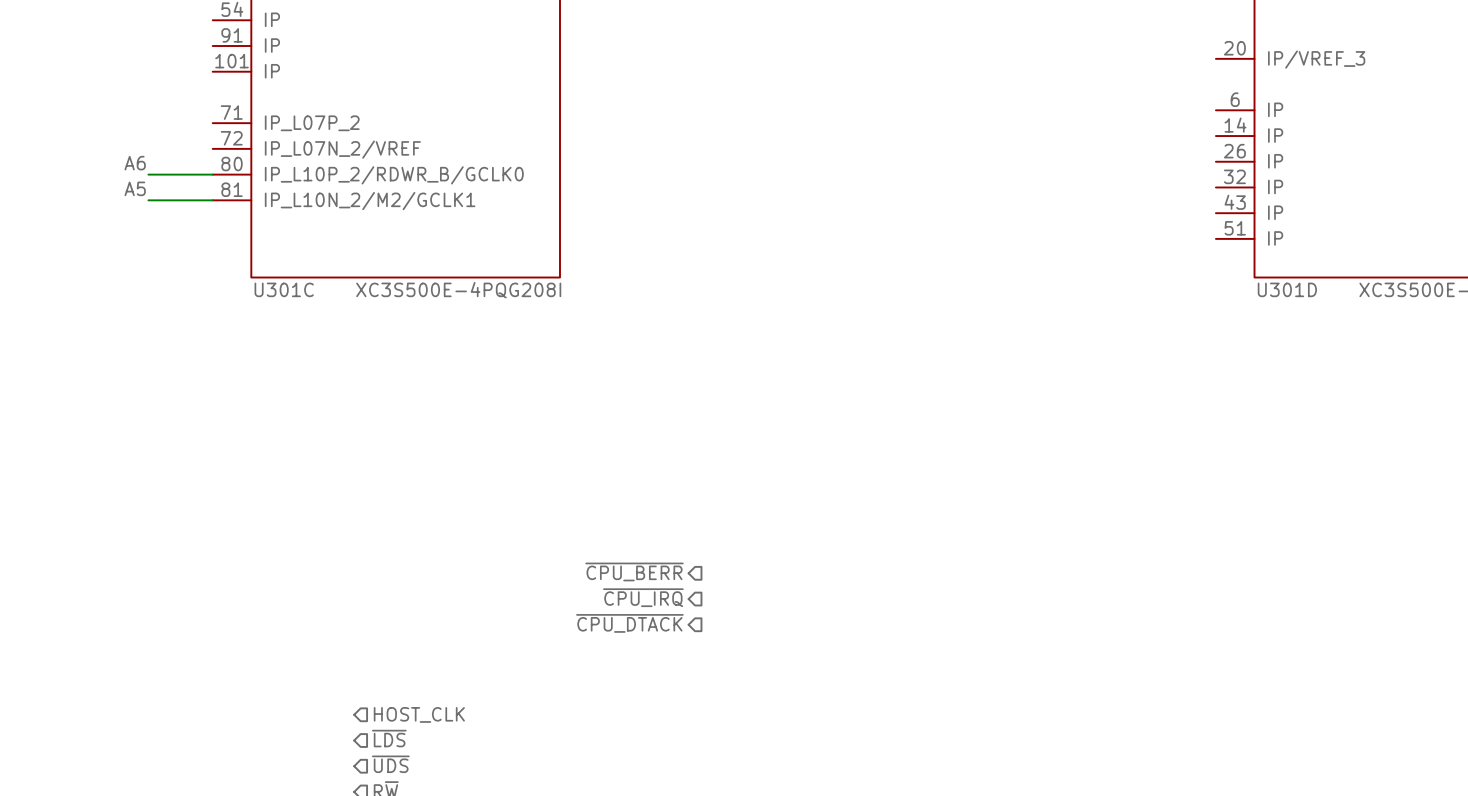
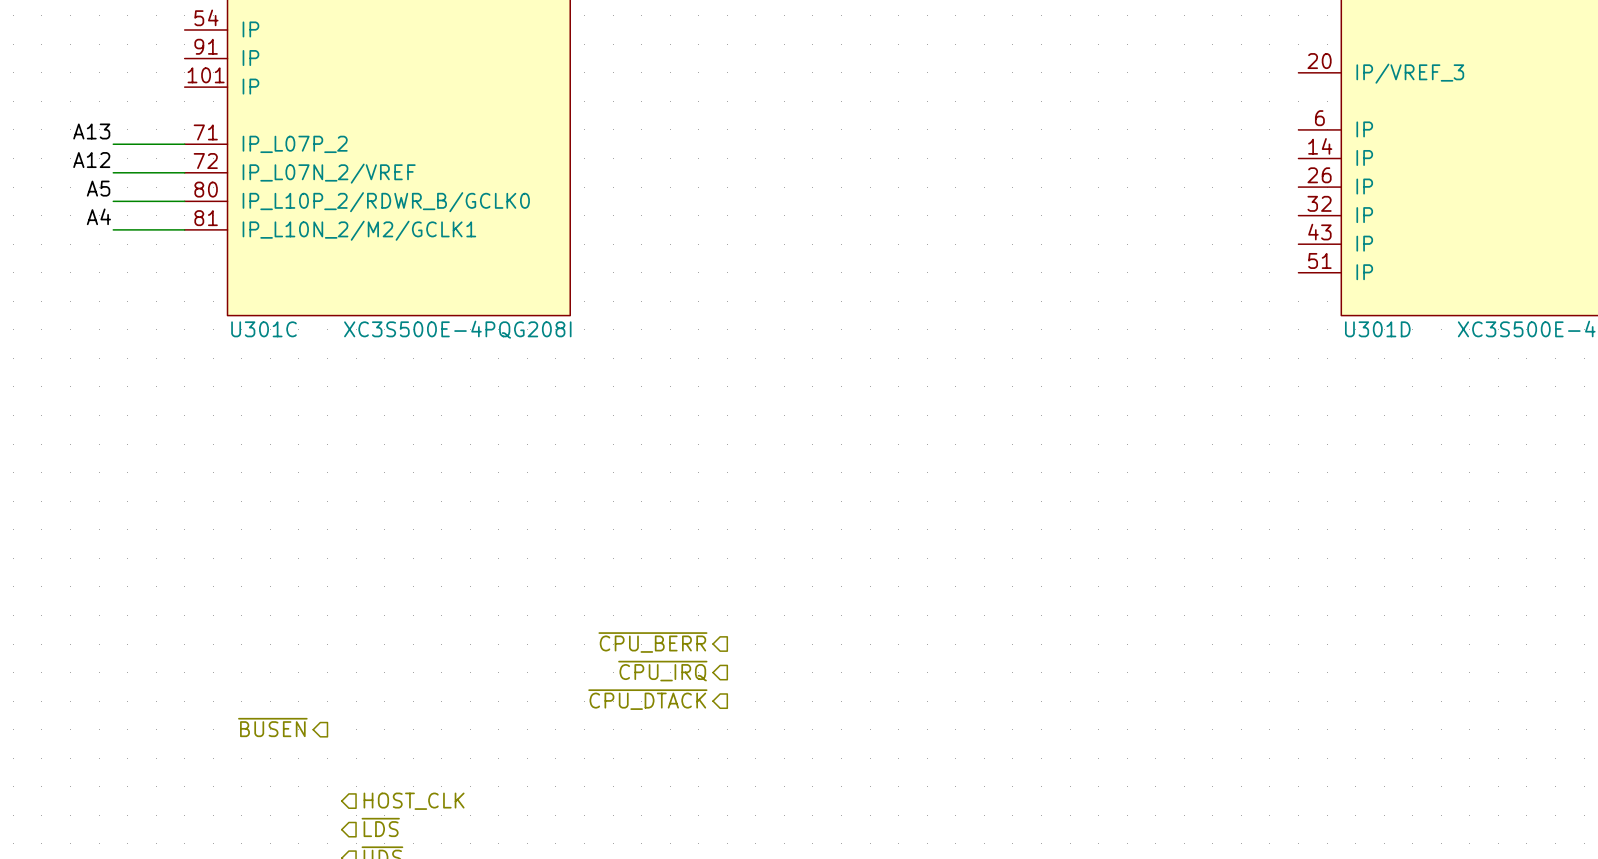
label: none -> A13 (91, 131)
wire: none -> (113, 144) (184, 144)
label: none -> A12 (91, 160)
wire: none -> (113, 172) (184, 172)
label: A6 (135, 163) -> A5 (98, 188)
label: A5 (135, 188) -> A4 (98, 216)
hierarchical label: none -> ~{BUSEN} (272, 727)

